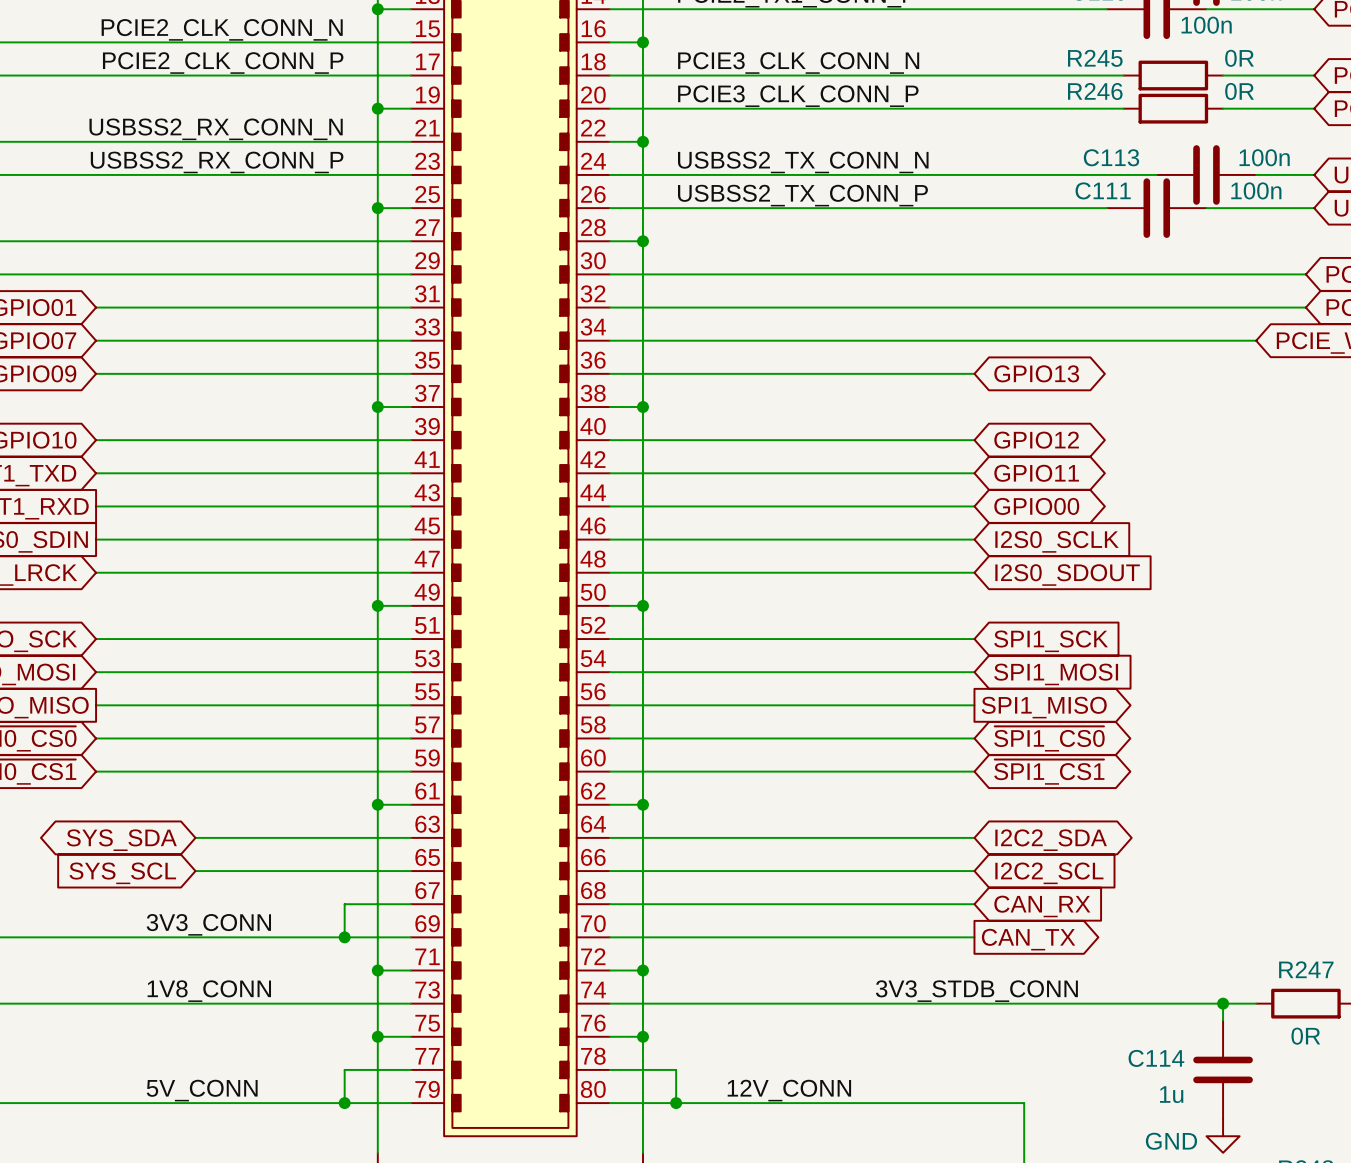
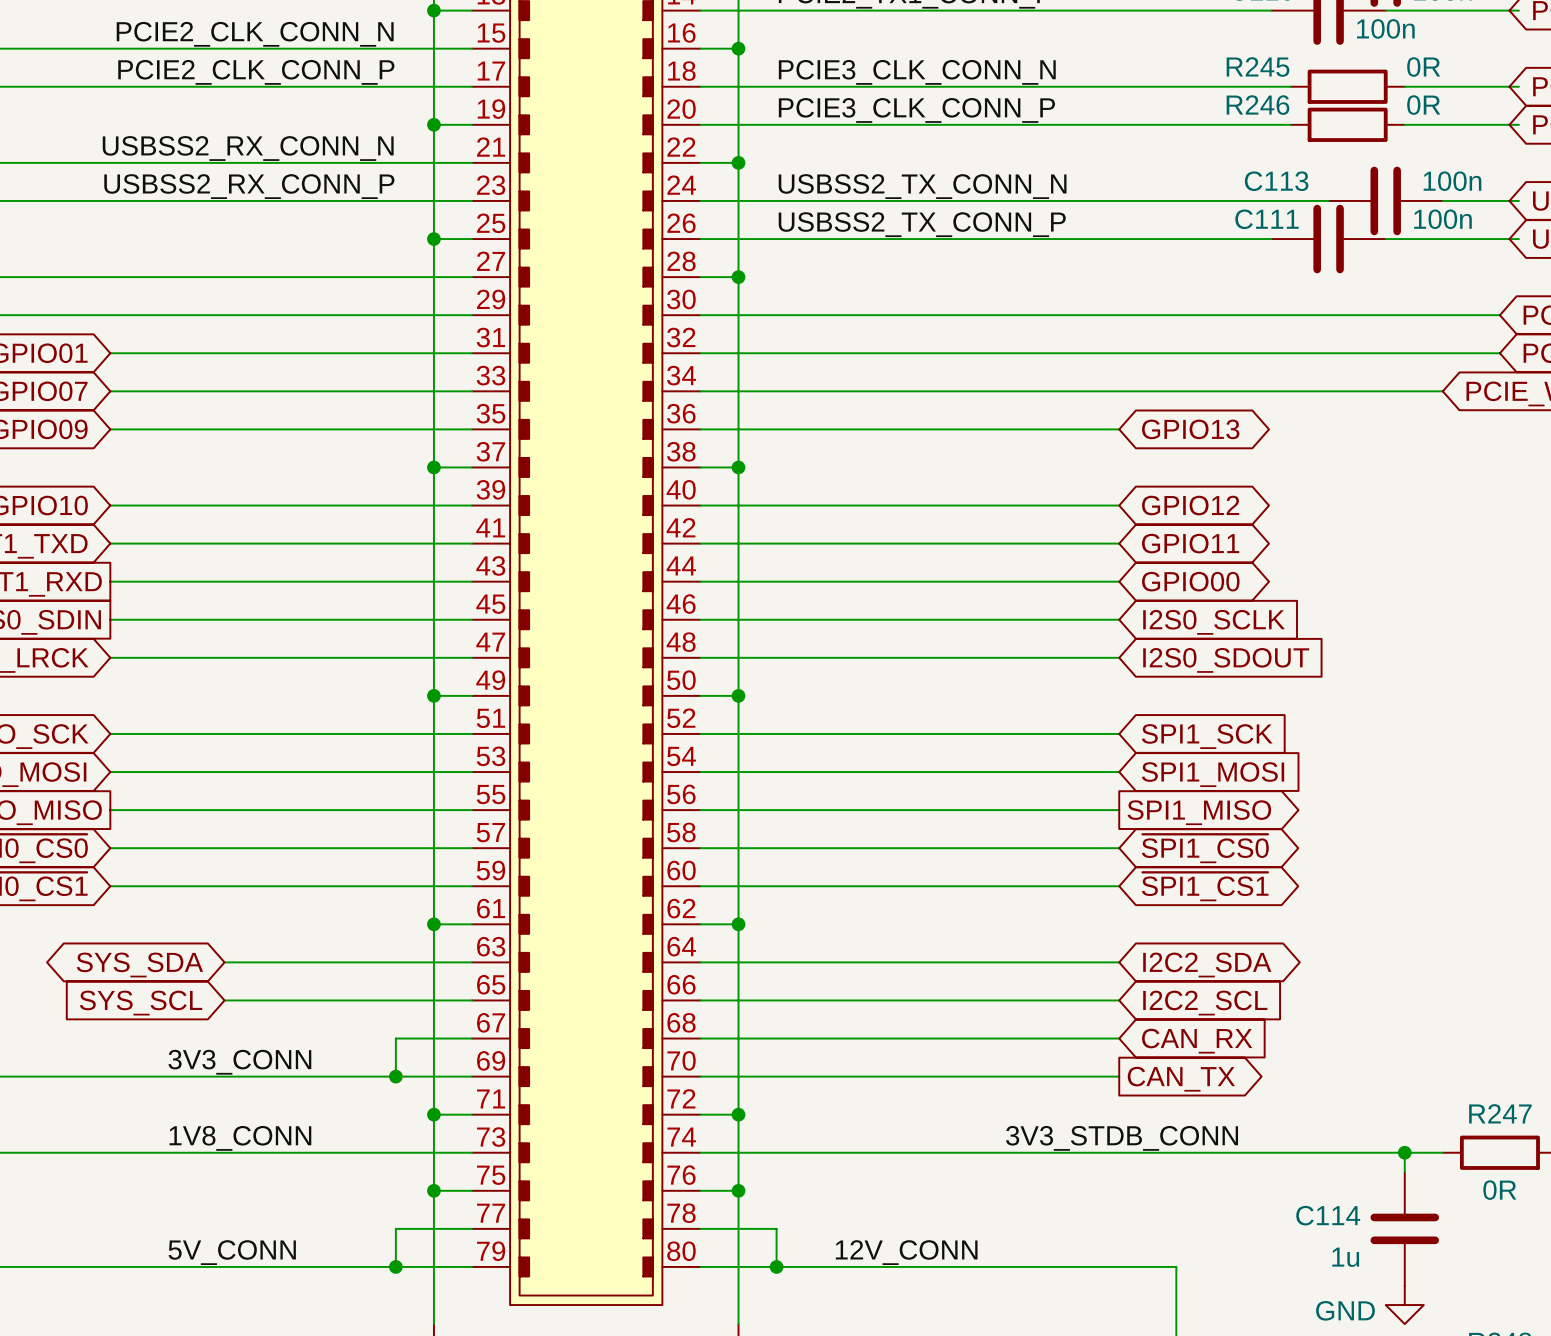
wire: none -> (1509, 10) (1518, 10)
wire: none -> (1509, 86) (1518, 86)
wire: none -> (1509, 124) (1518, 124)
wire: none -> (1509, 200) (1518, 200)
wire: none -> (1509, 239) (1518, 239)

